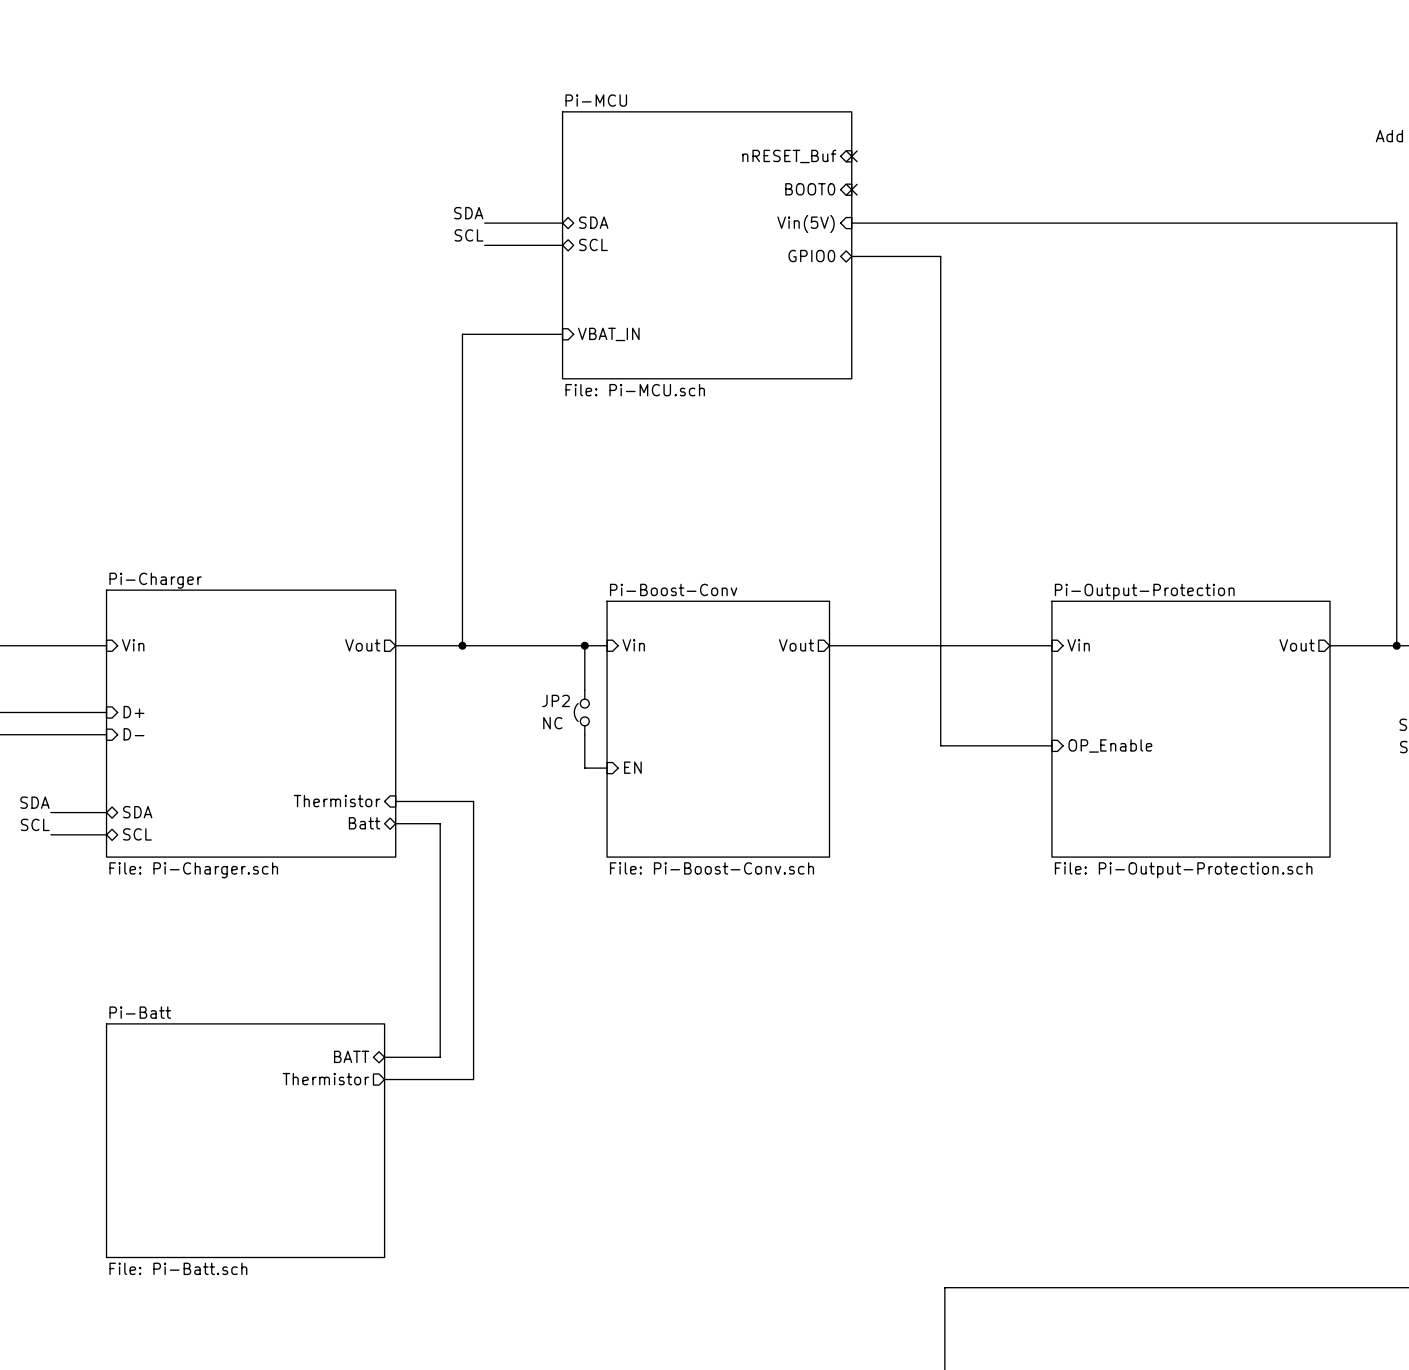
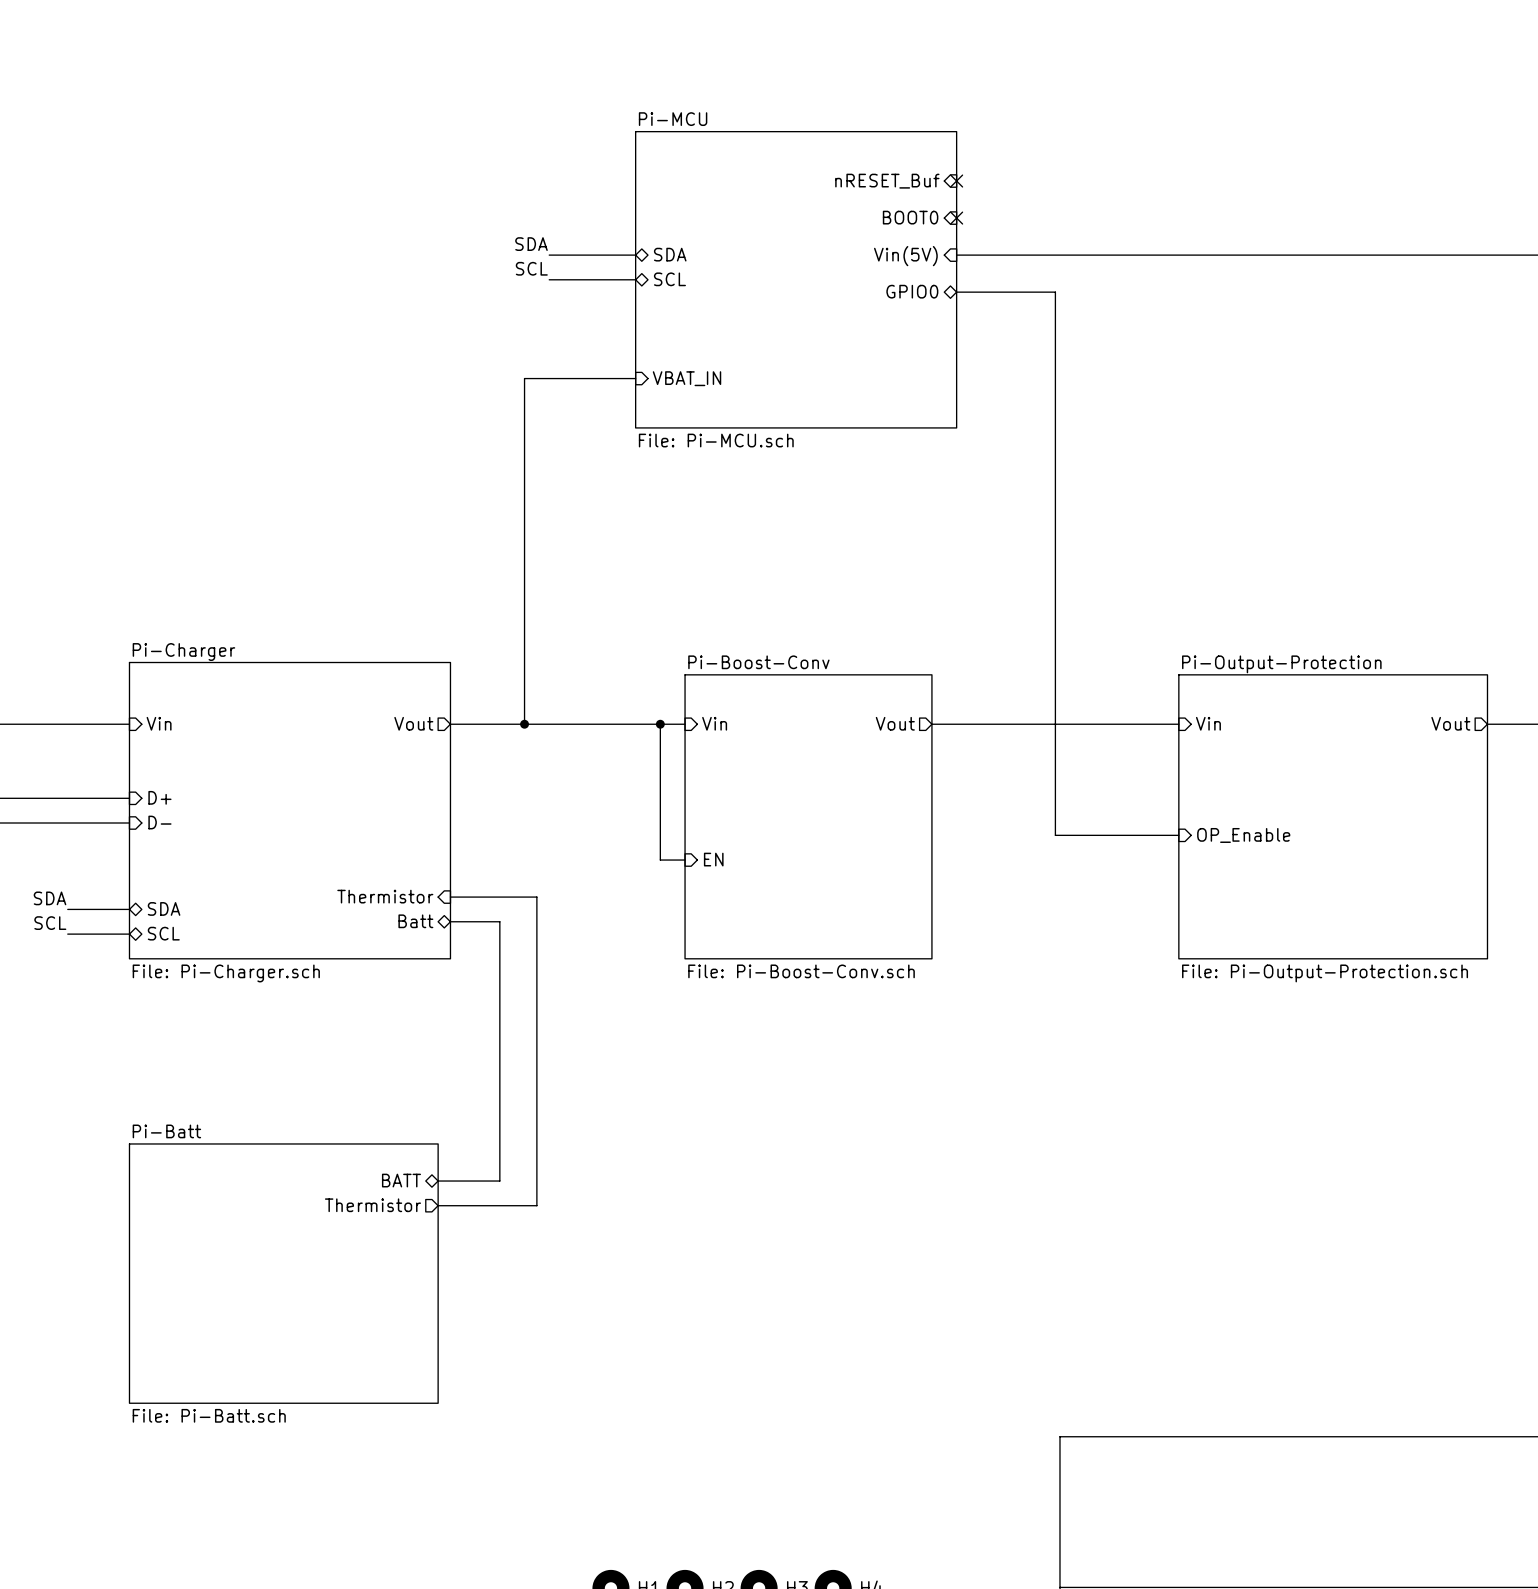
wire: none -> (660, 773) (660, 823)
JP2: NC (581, 712) -> none

